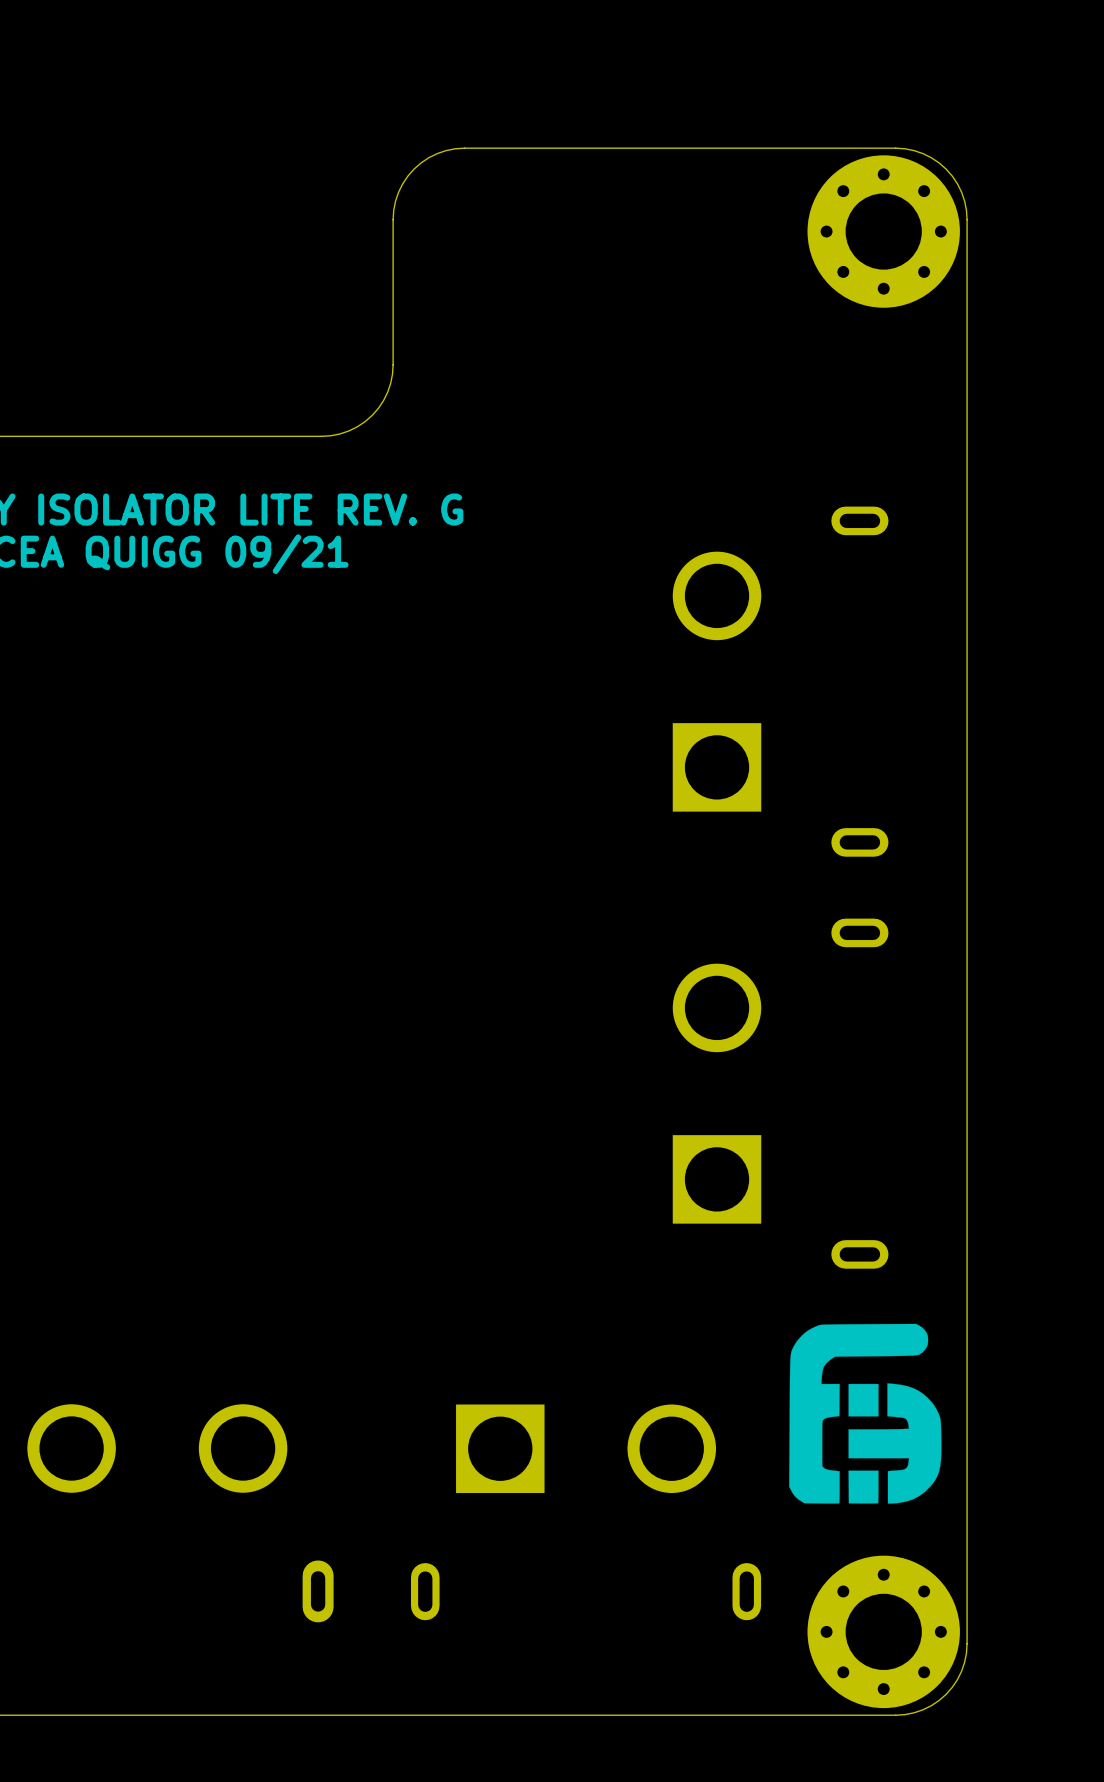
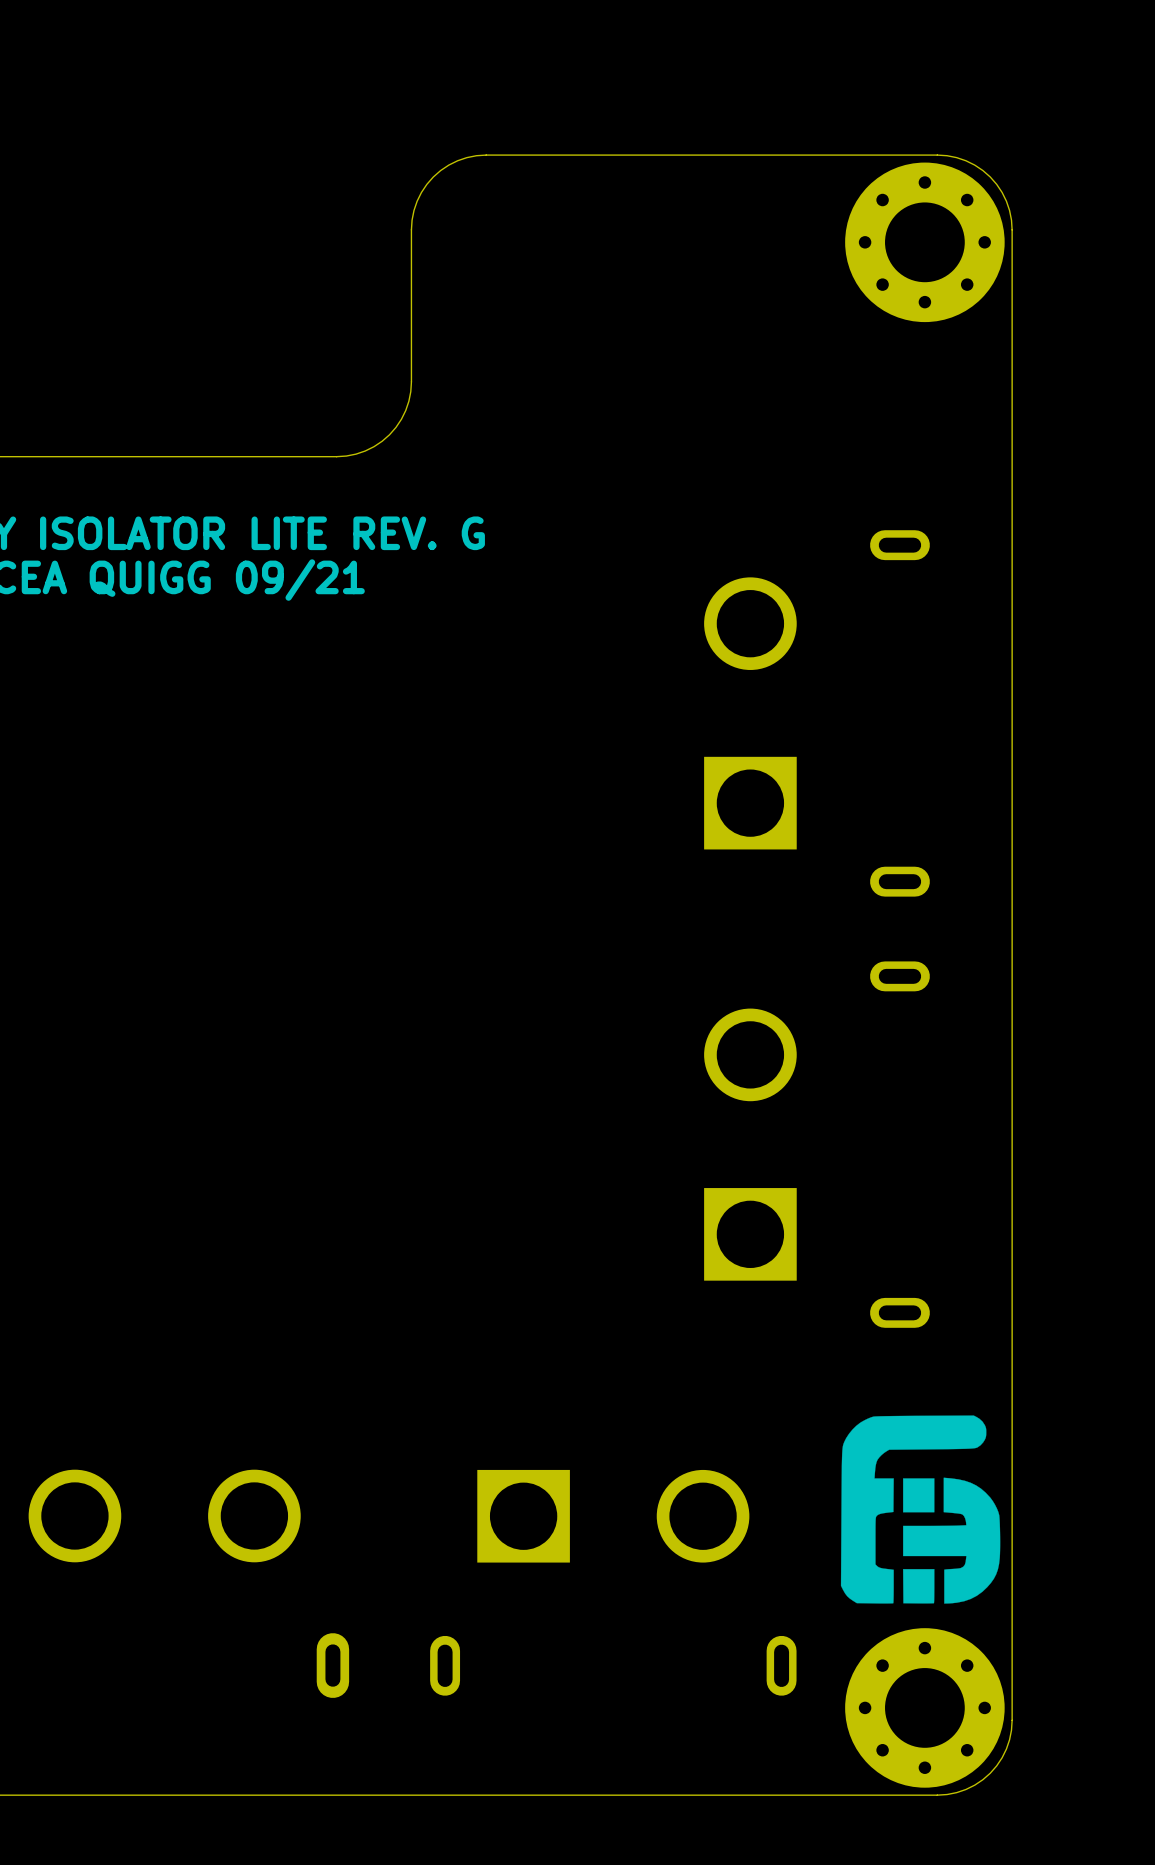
drawing position: (865, 1413) -> (920, 1509)

